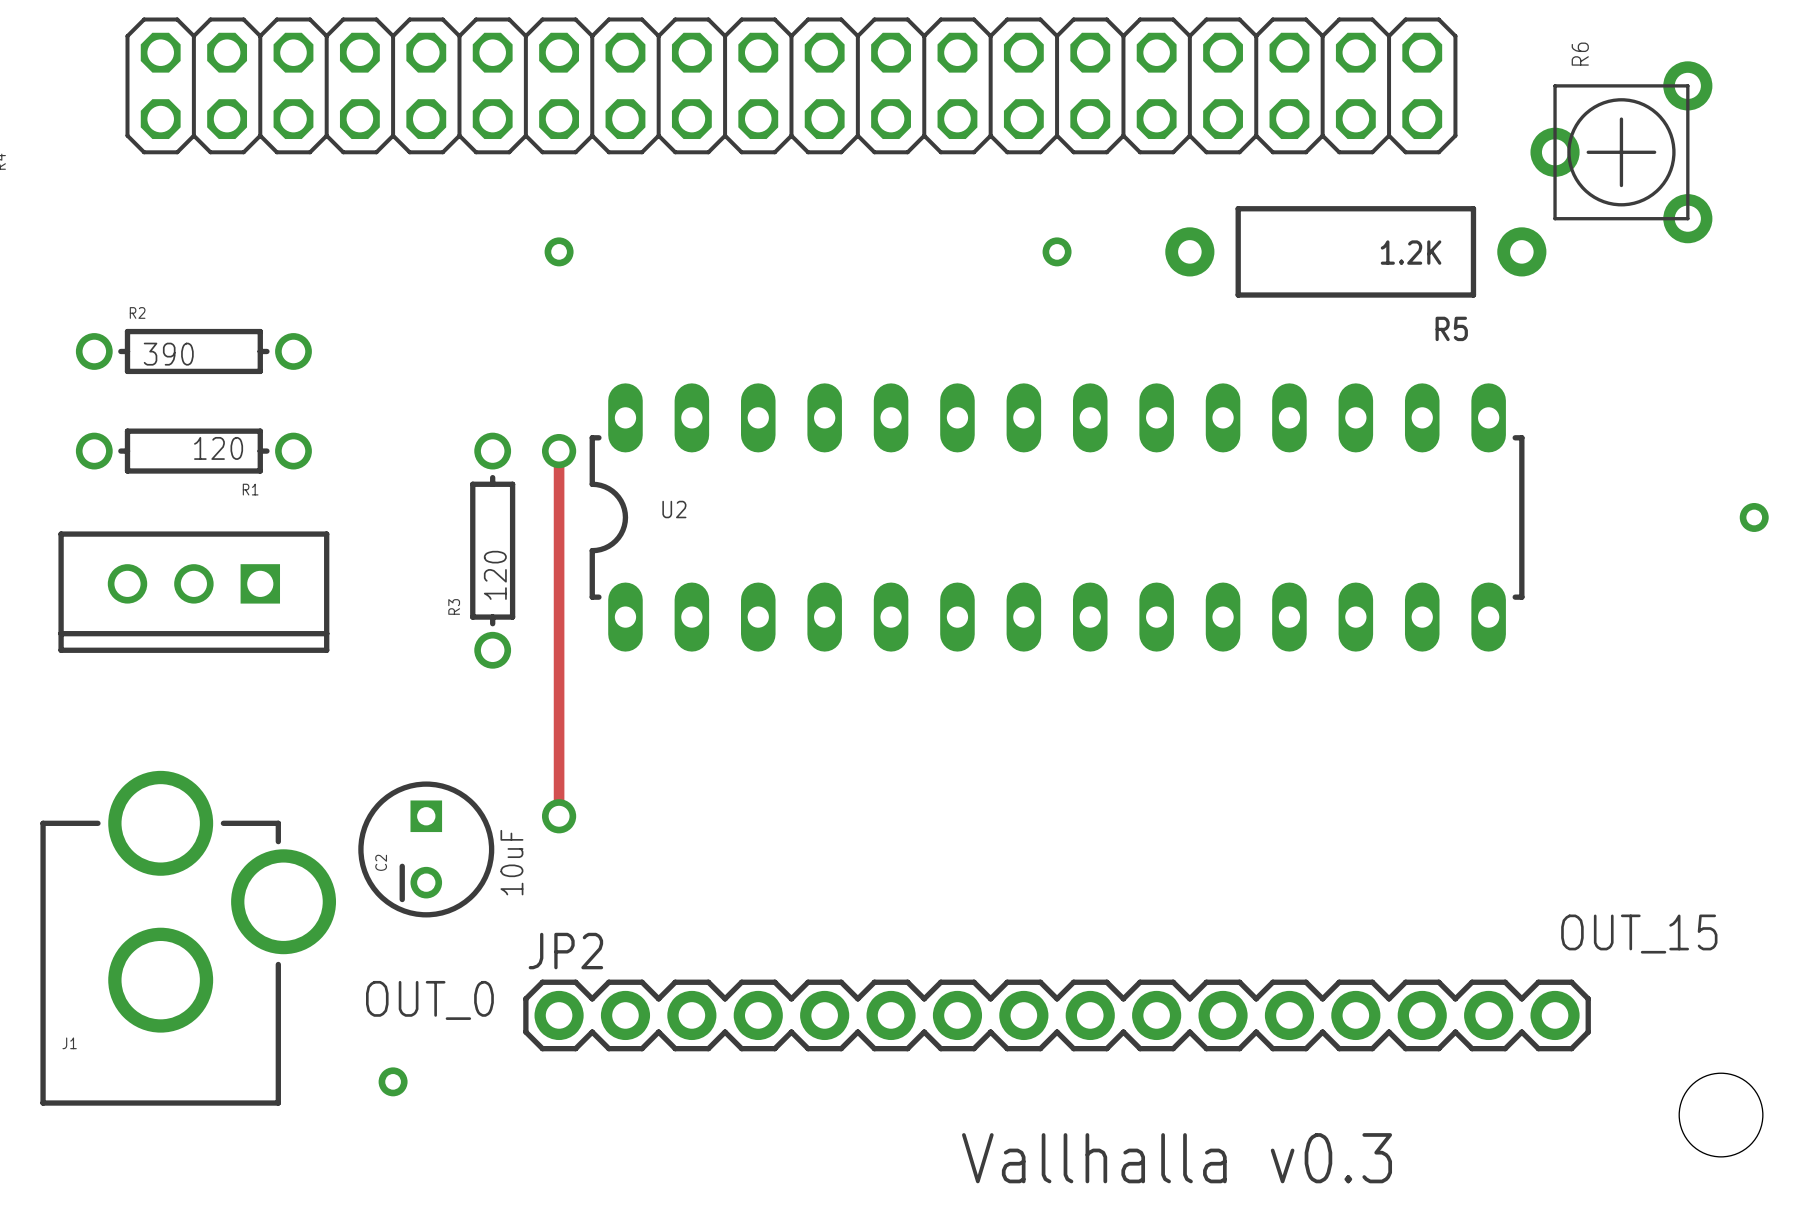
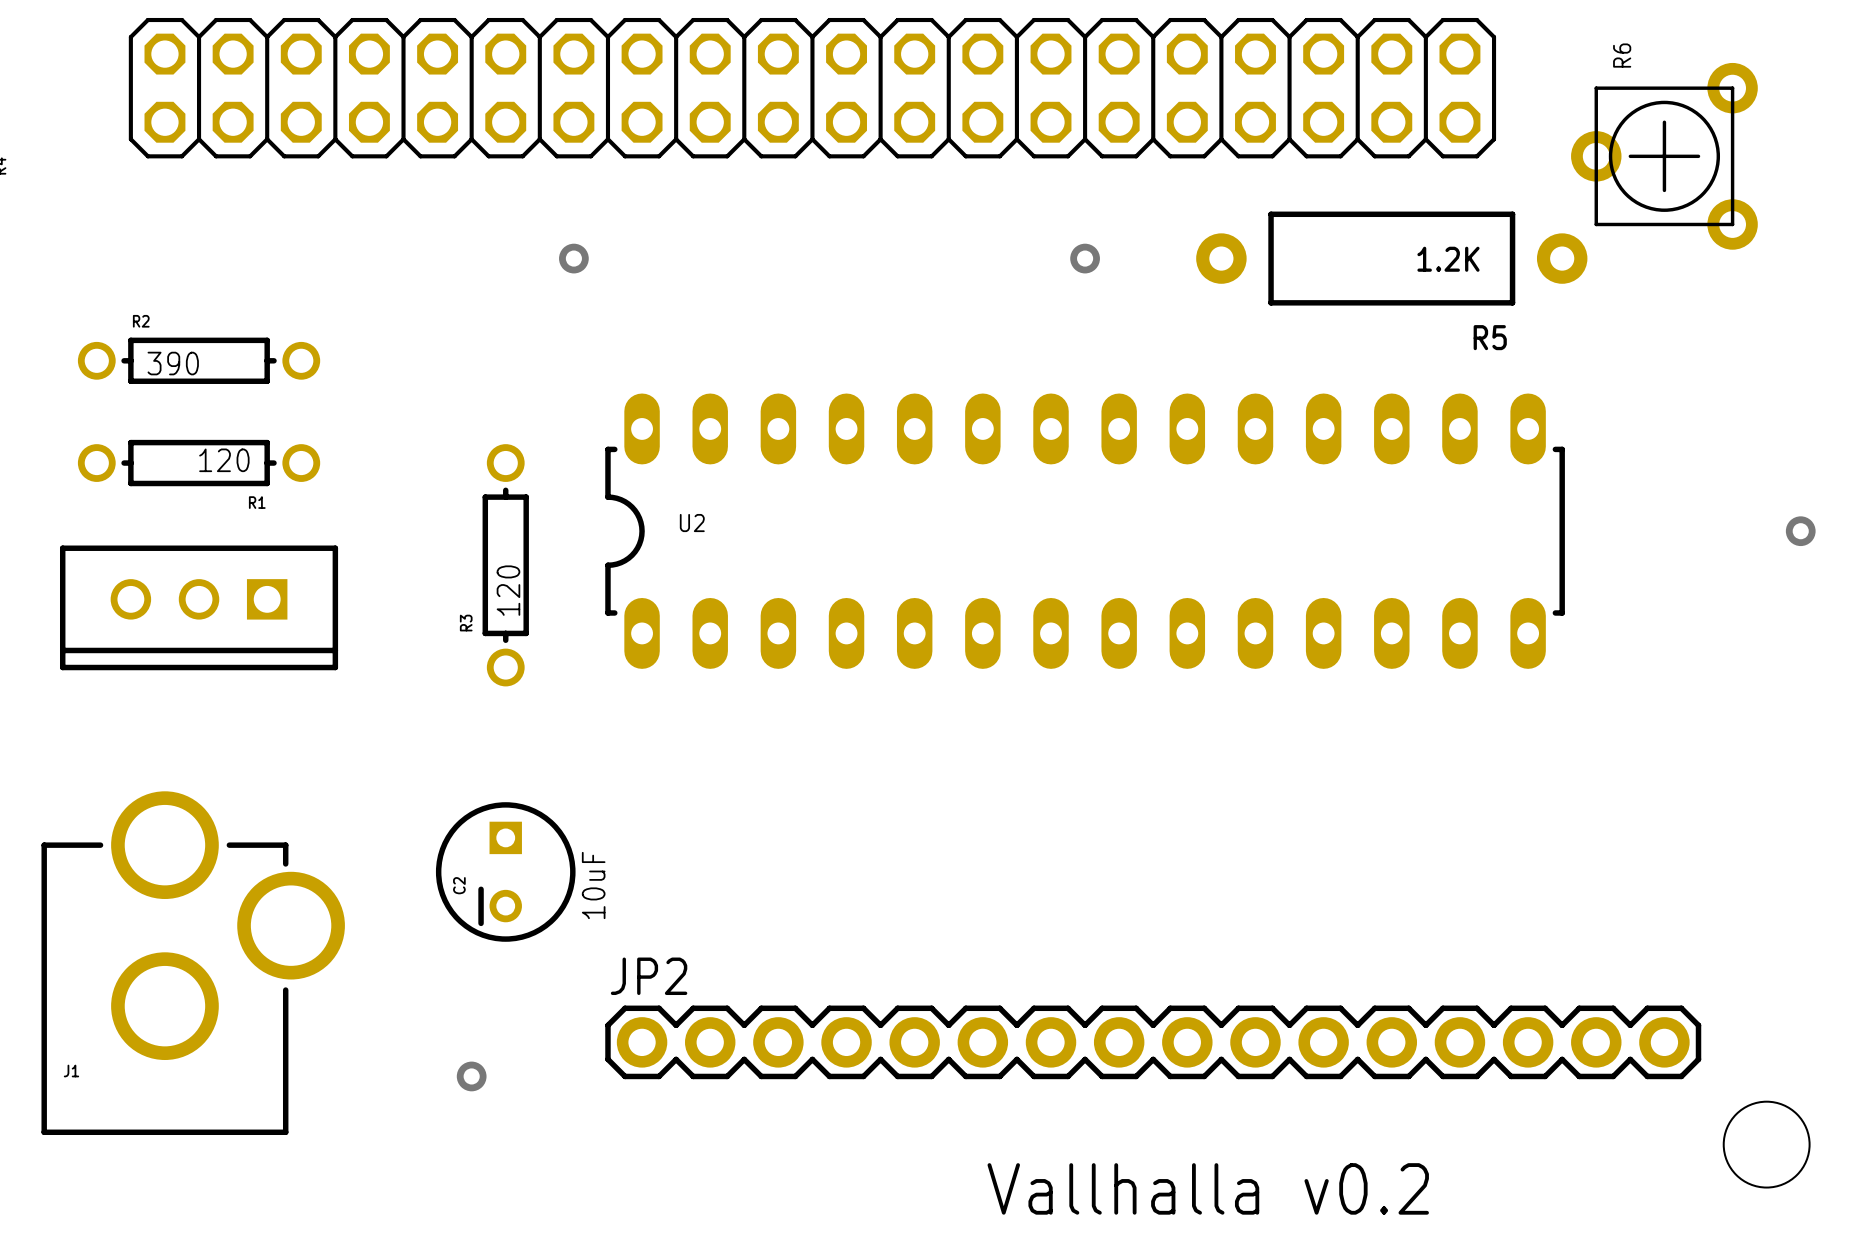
track: (559, 451) (559, 816) -> none
via: (559, 451) -> none
via: (559, 816) -> none
C2 position: (426, 849) -> (505, 871)
text: OUT_15 (1639, 934) -> none
text: OUT_0 (429, 1000) -> none
JP2 position: (1057, 1015) -> (1153, 1042)
via position: (393, 1081) -> (471, 1076)
text: Vallhalla v0.3 (1177, 1158) -> Vallhalla v0.2 (1208, 1188)

